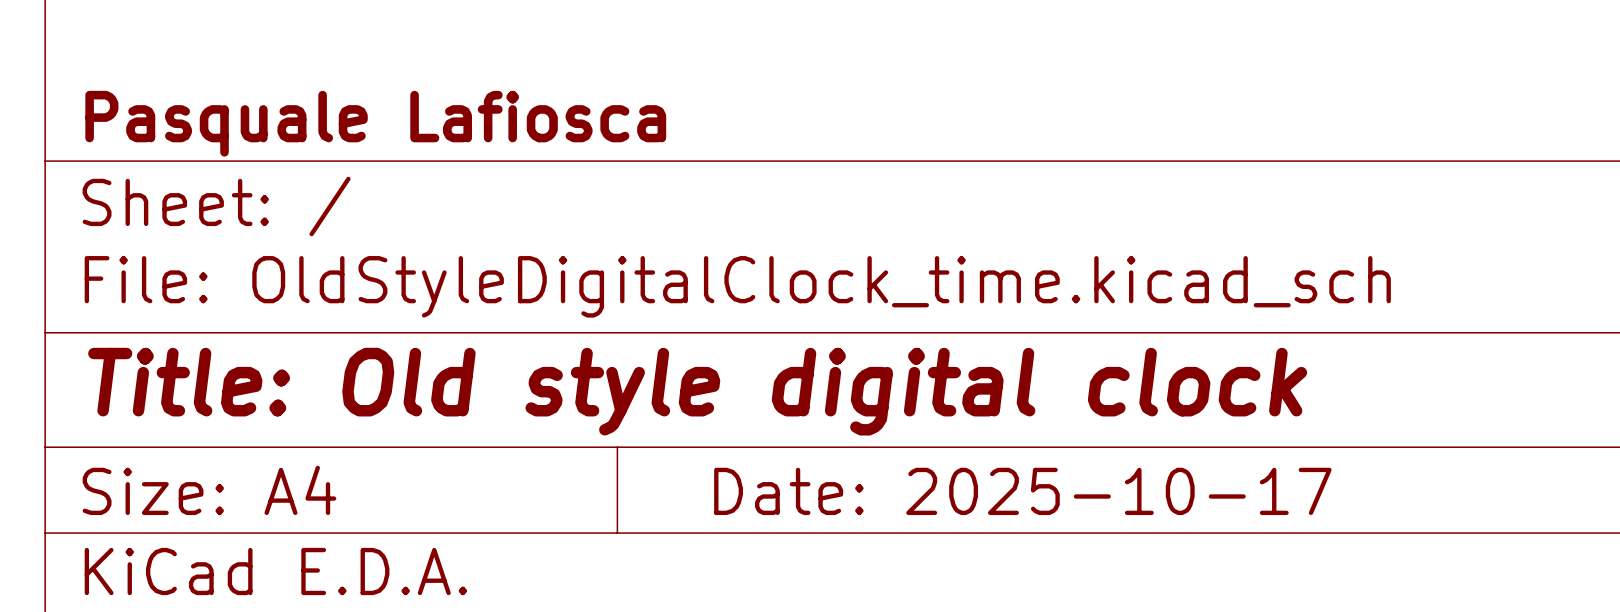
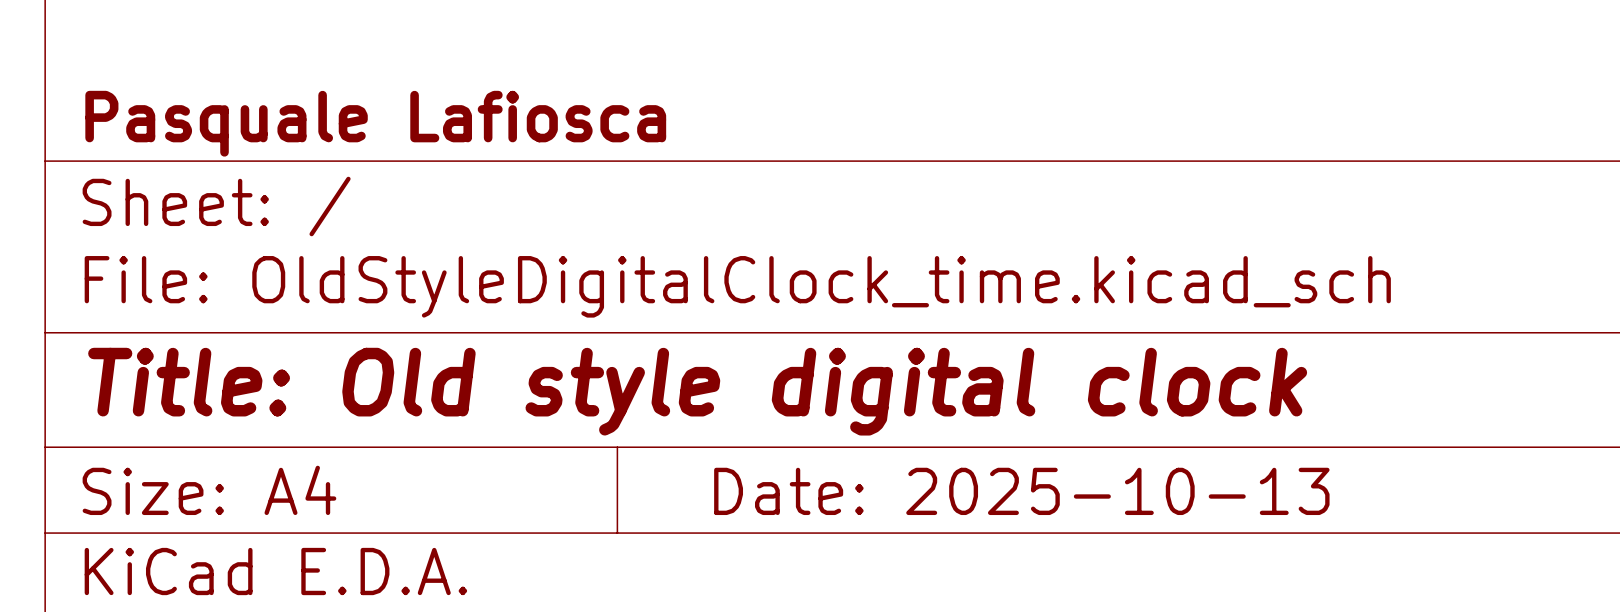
title block: Date: 2025-10-17 (1022, 491) -> Date: 2025-10-13 (1021, 491)

